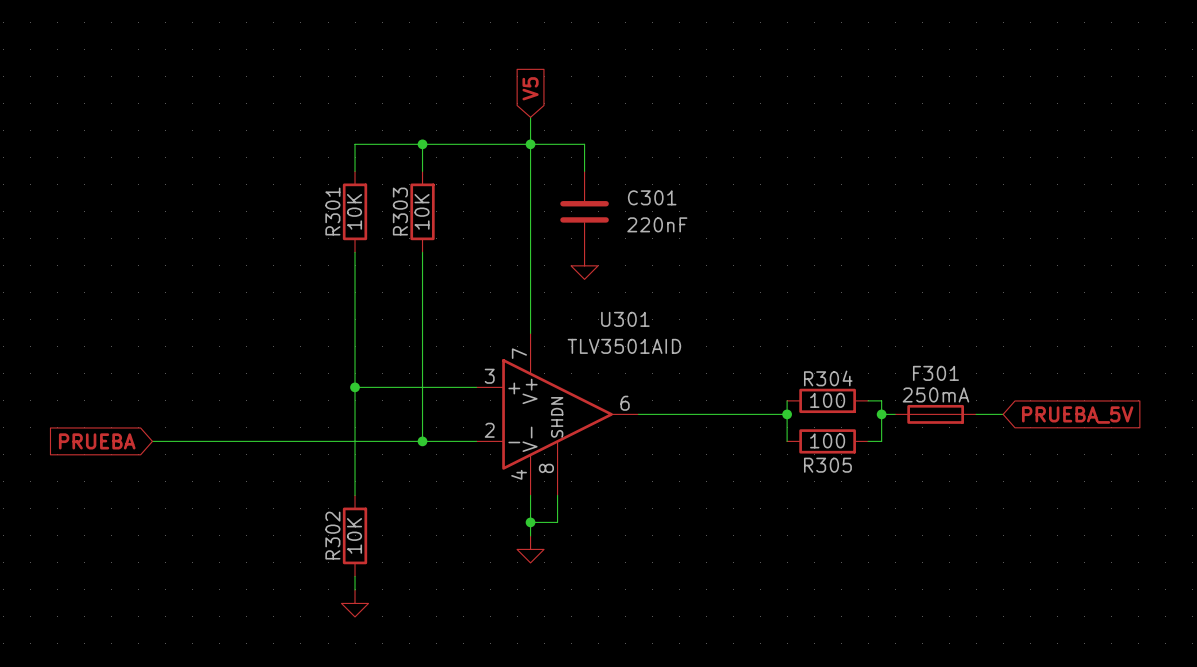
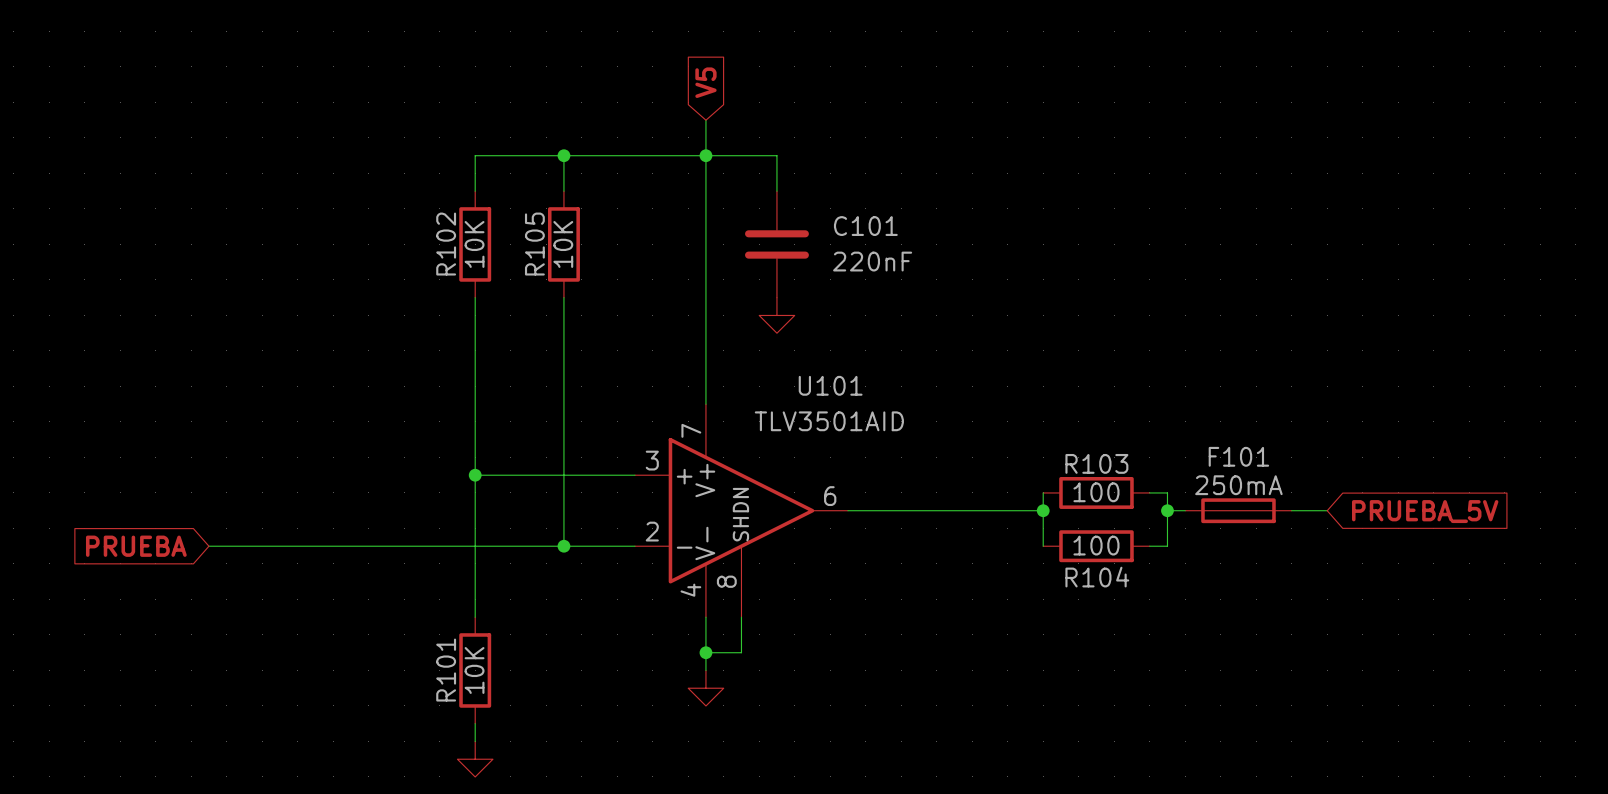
C301 name: C301 (652, 197) -> C101 (865, 226)
R301 name: R301 (332, 211) -> R102 (446, 244)
R303 name: R303 (400, 211) -> R105 (534, 244)
U301 name: U301 (625, 319) -> U101 (830, 385)
F301 name: F301 (935, 373) -> F101 (1238, 456)
R304 name: R304 (828, 378) -> R103 (1096, 463)
R305 name: R305 (827, 465) -> R104 (1097, 577)
R302 name: R302 (332, 535) -> R101 (446, 670)

